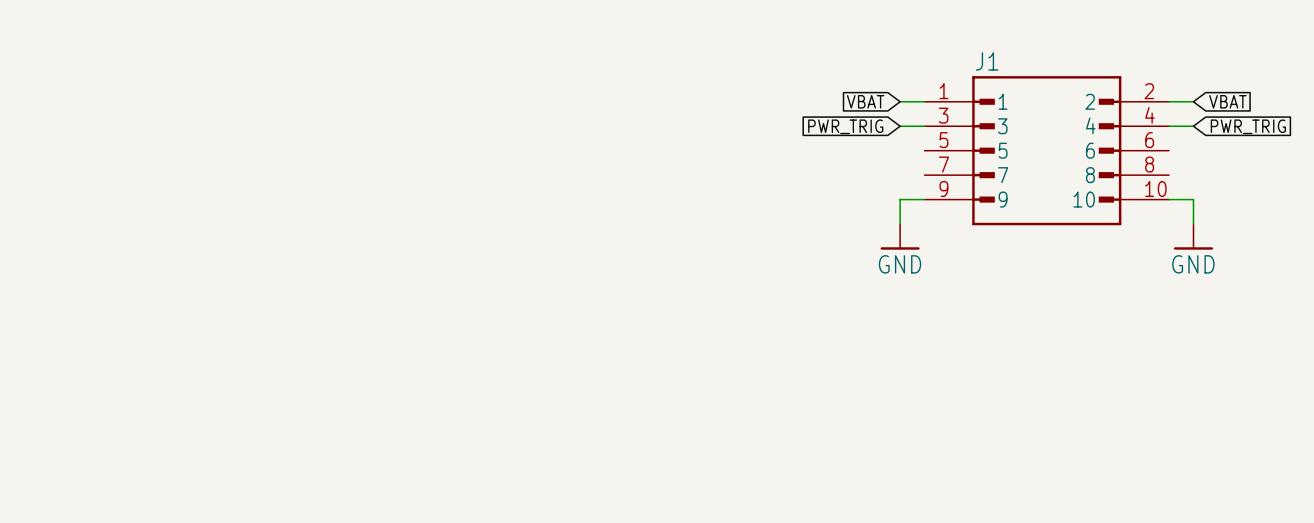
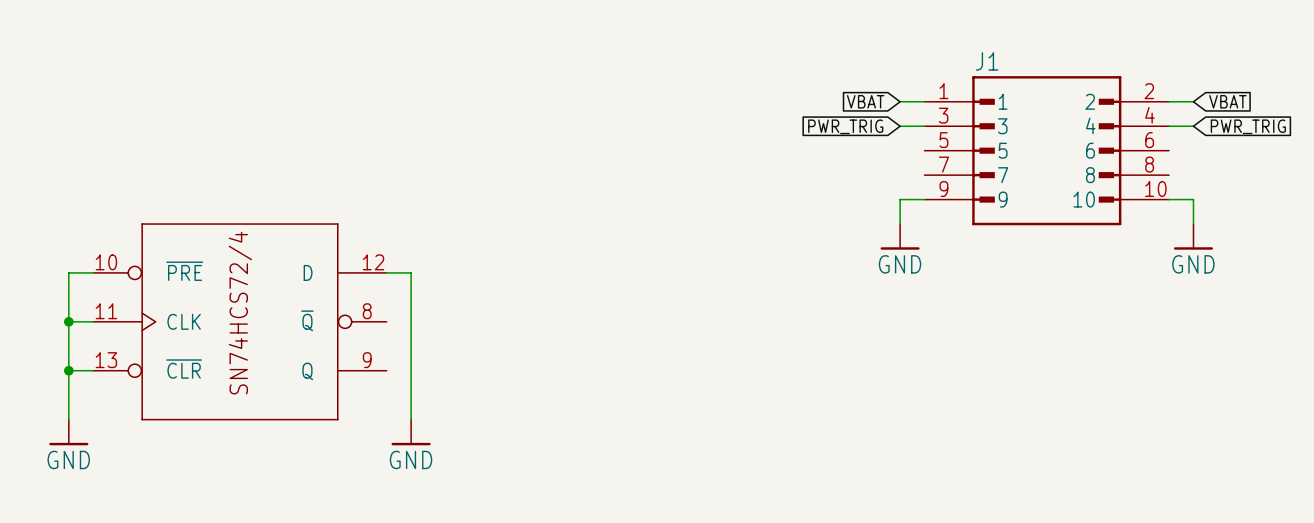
wire: none -> (93, 272) (68, 272) (68, 419)
wire: none -> (386, 272) (411, 272) (411, 419)
wire: none -> (68, 321) (93, 321)
junction: none -> (68, 321)
part: none -> (239, 321)
wire: none -> (68, 370) (93, 370)
junction: none -> (68, 370)
power symbol: none -> GND (68, 432)
power symbol: none -> GND (411, 432)

